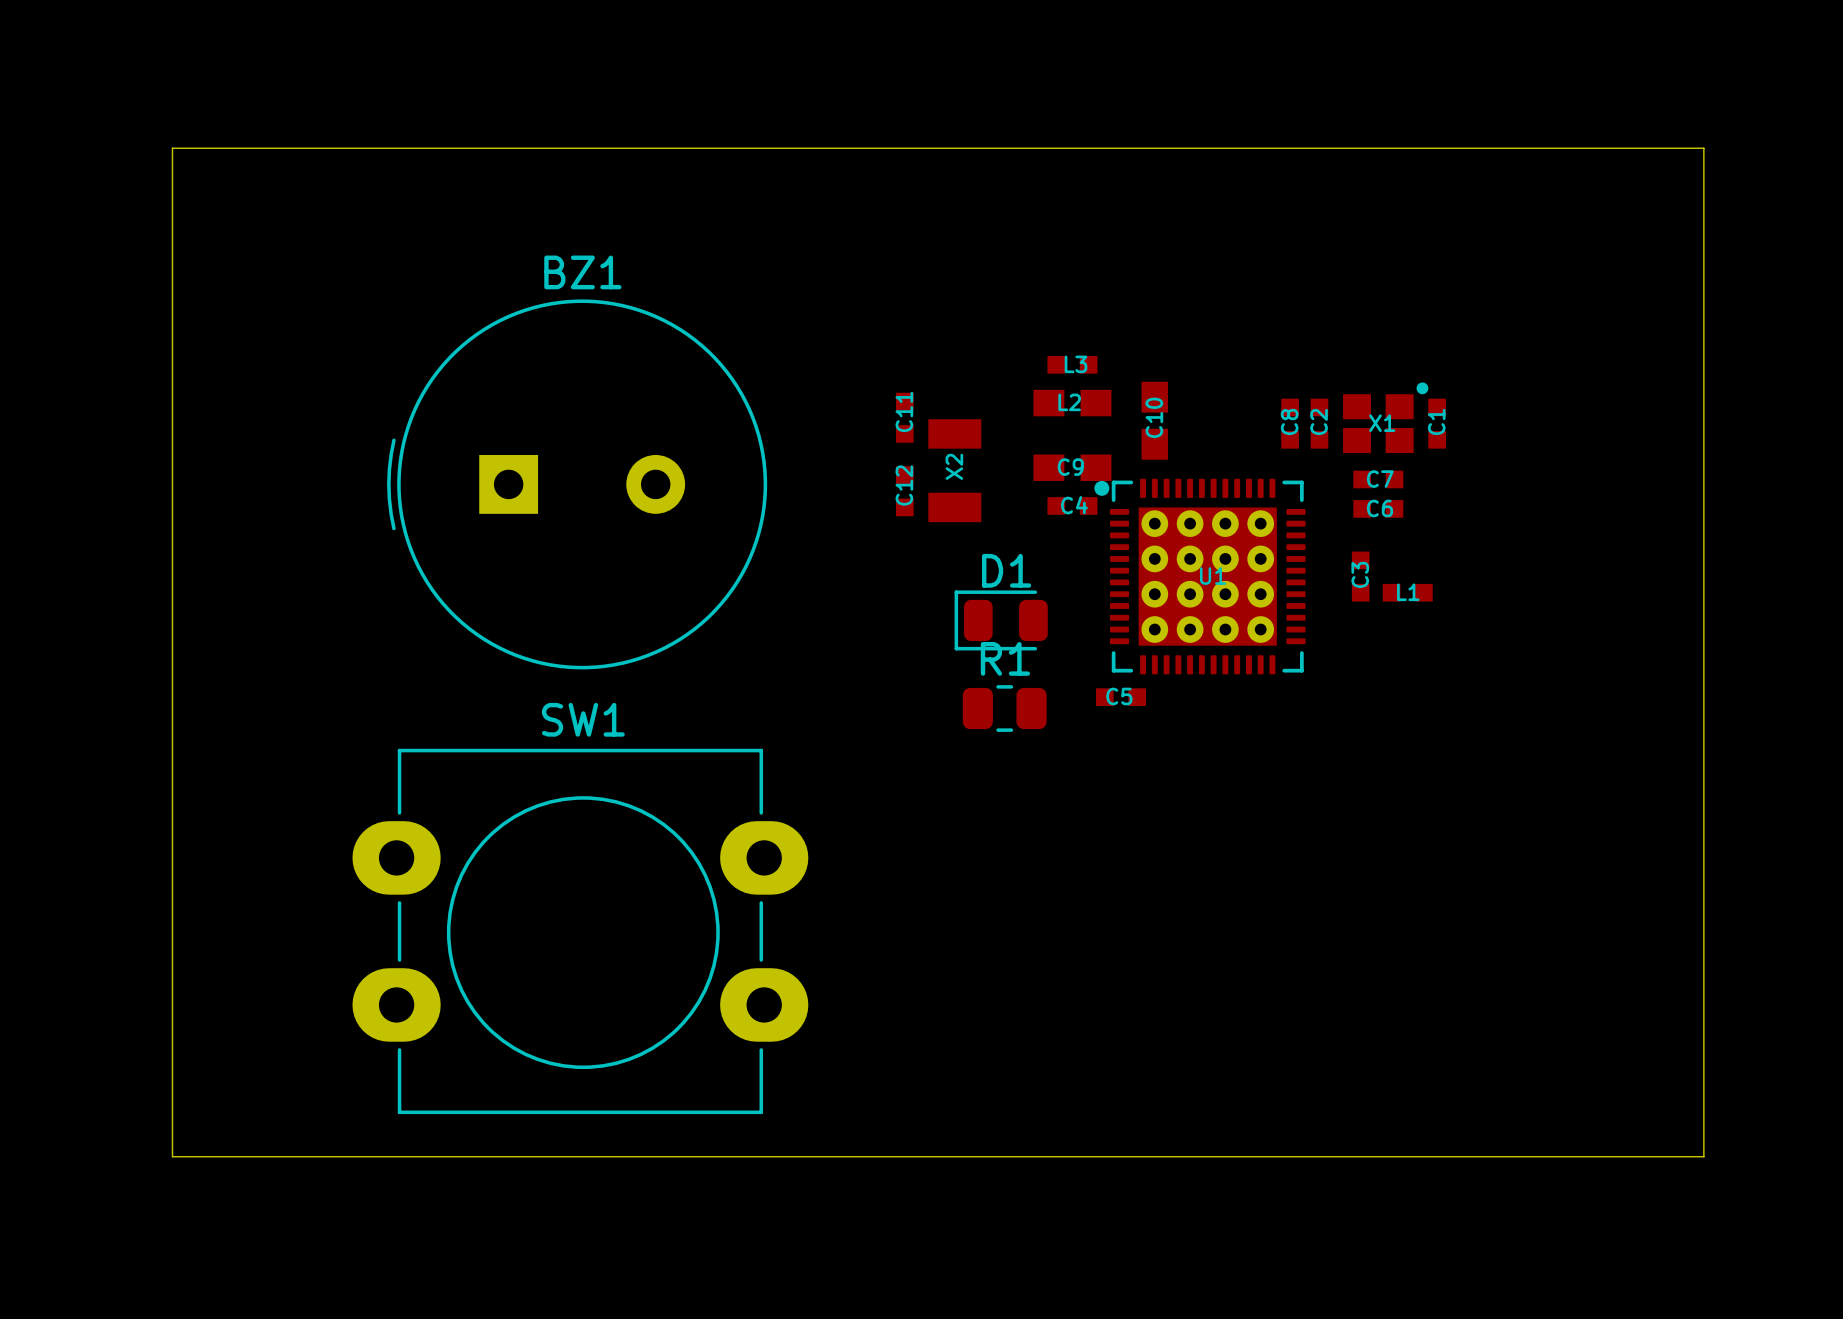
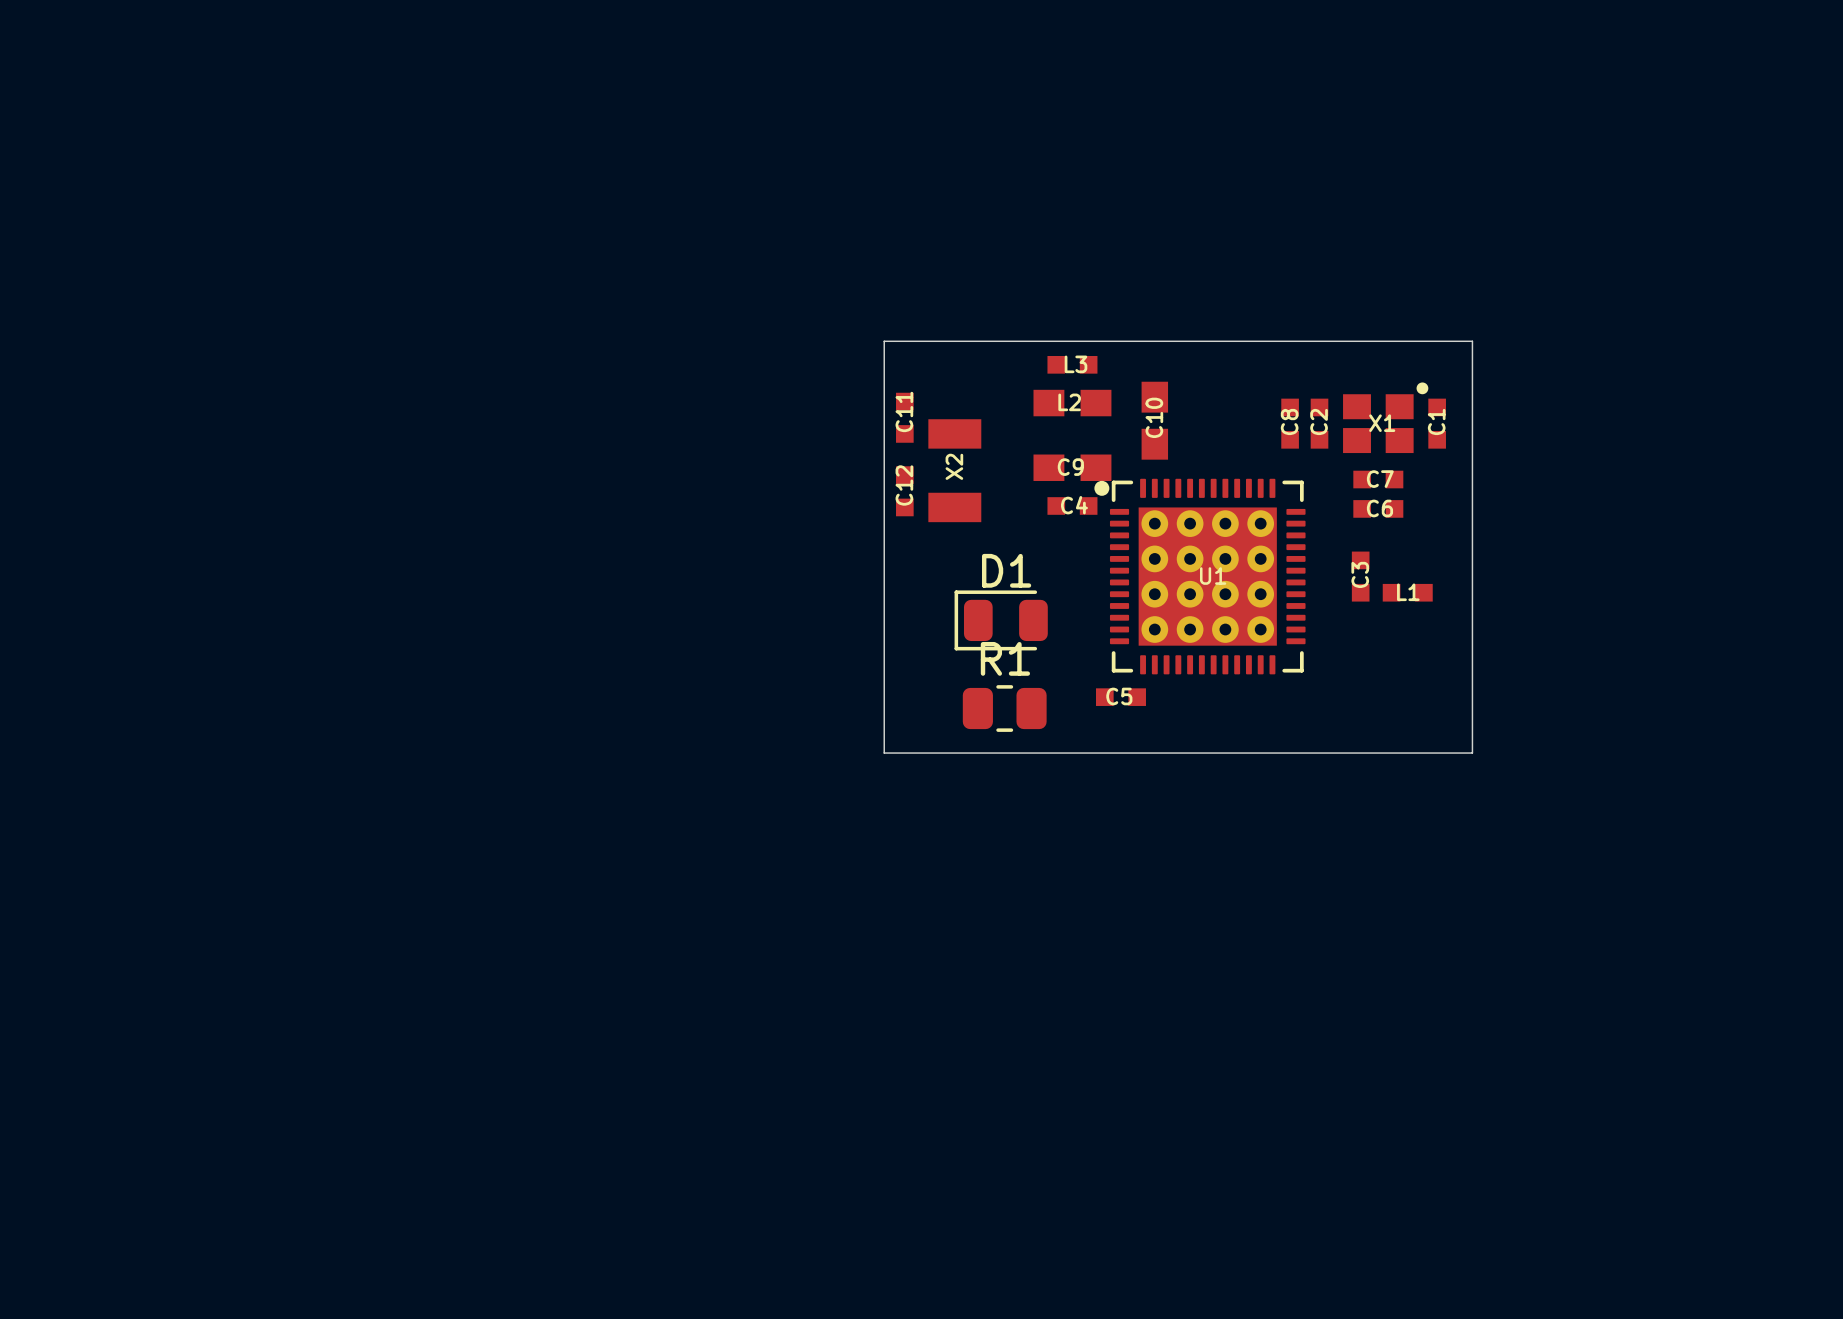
board edge: (172, 148) (172, 1156) (1703, 1156) (1703, 148) (172, 148) -> none
board edge: none -> (884, 341) (884, 753) (1472, 753) (1472, 341) (884, 341)
BZ1: (577, 484) -> none
SW1: (580, 931) -> none

